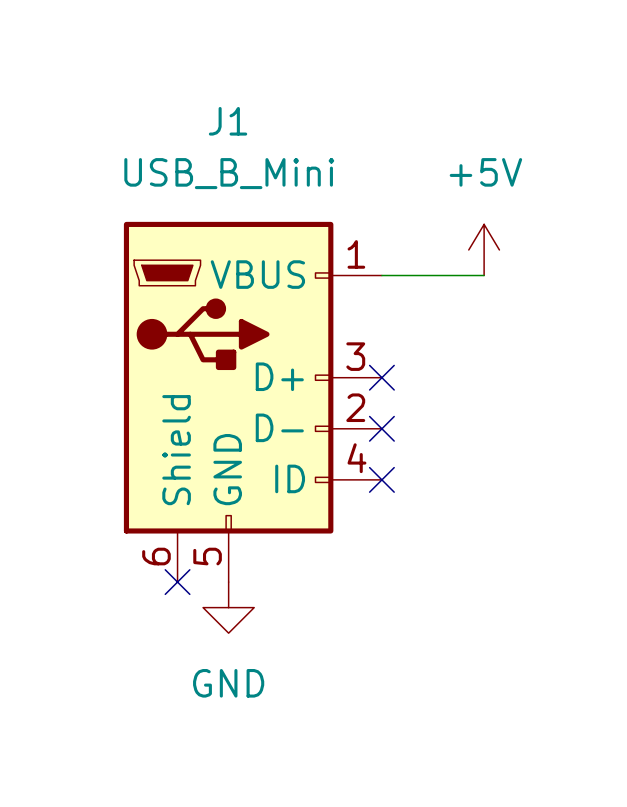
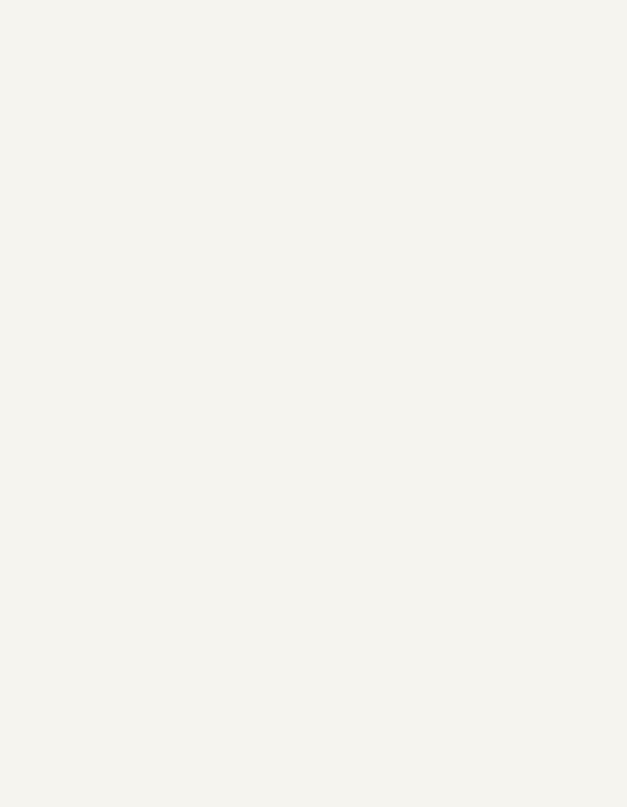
power symbol: +5V (484, 249) -> none
wire: (381, 275) (484, 275) -> none
no-connect mark: (381, 377) -> none
J1: USB_B_Mini (252, 401) -> none
no-connect mark: (381, 428) -> none
no-connect mark: (381, 479) -> none
no-connect mark: (177, 582) -> none
power symbol: GND (228, 607) -> none

